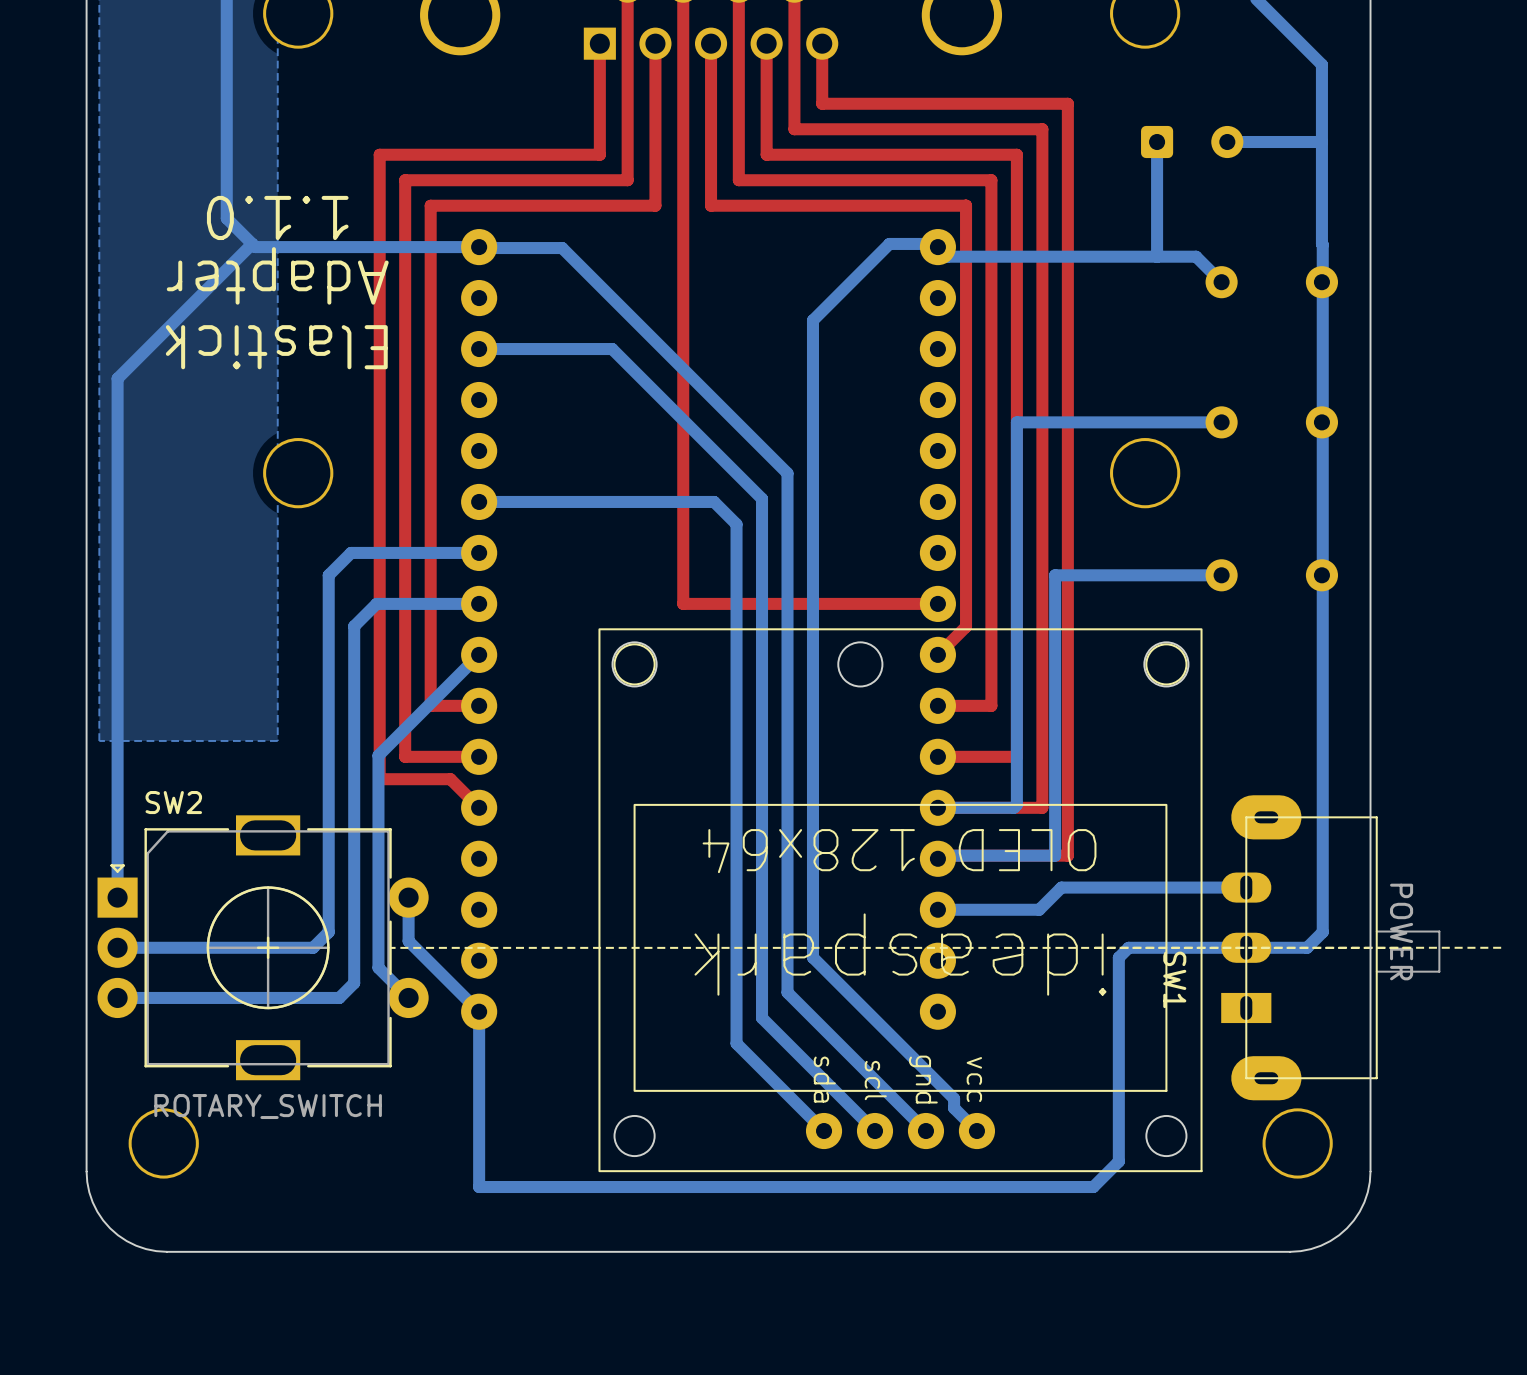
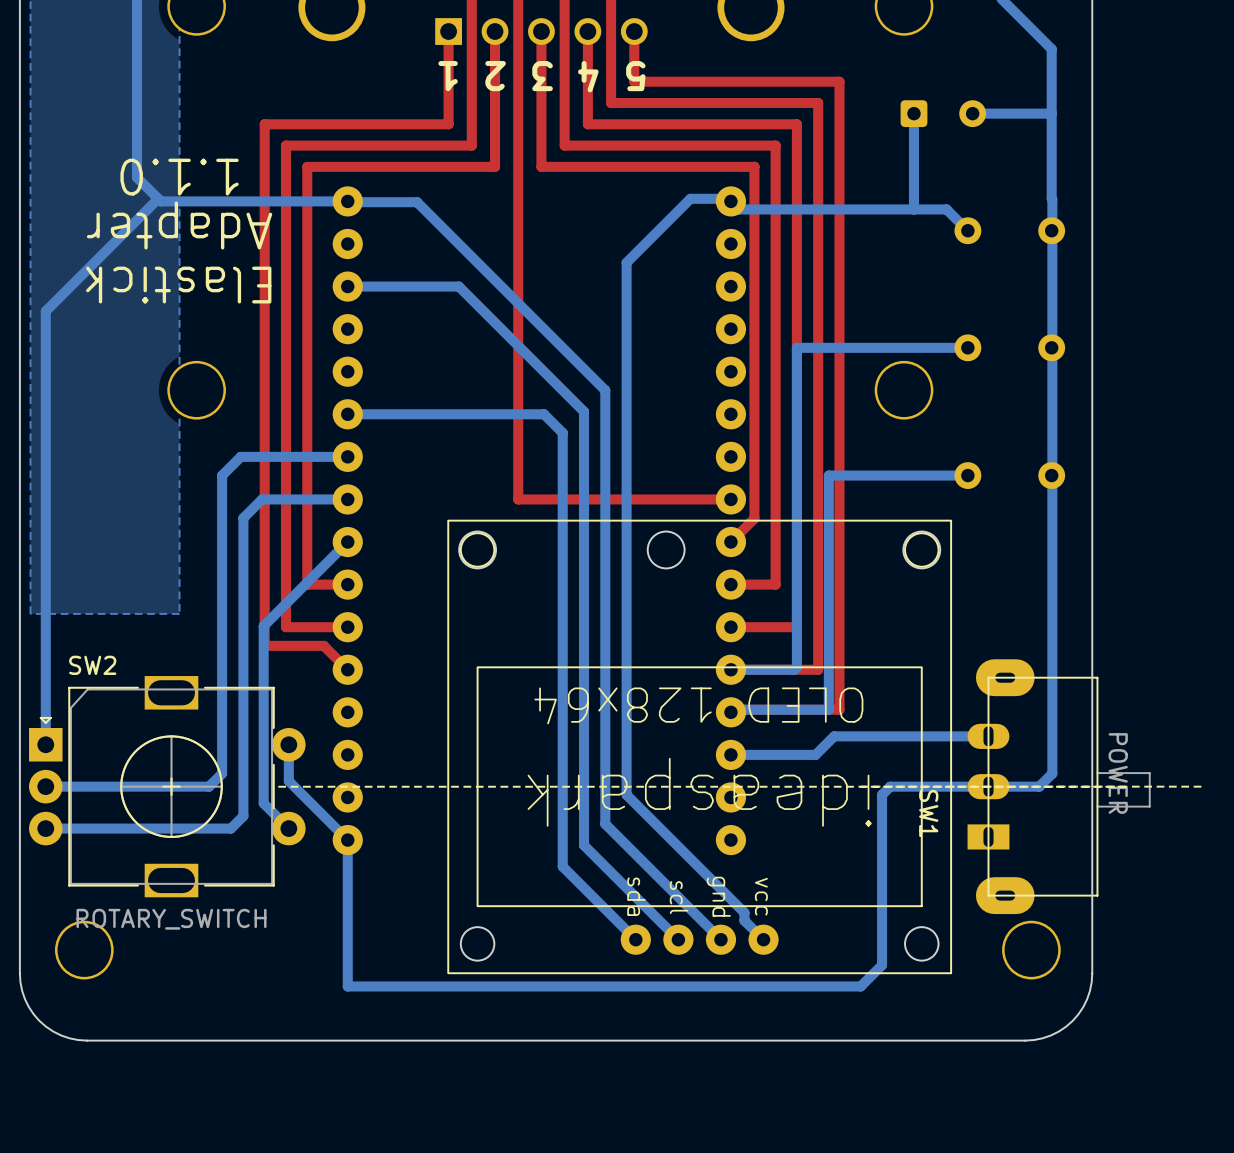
text: none -> 1 (448, 76)
text: none -> 2 (495, 76)
text: none -> 3 (542, 76)
text: none -> 4 (588, 76)
text: none -> 5 (635, 76)

